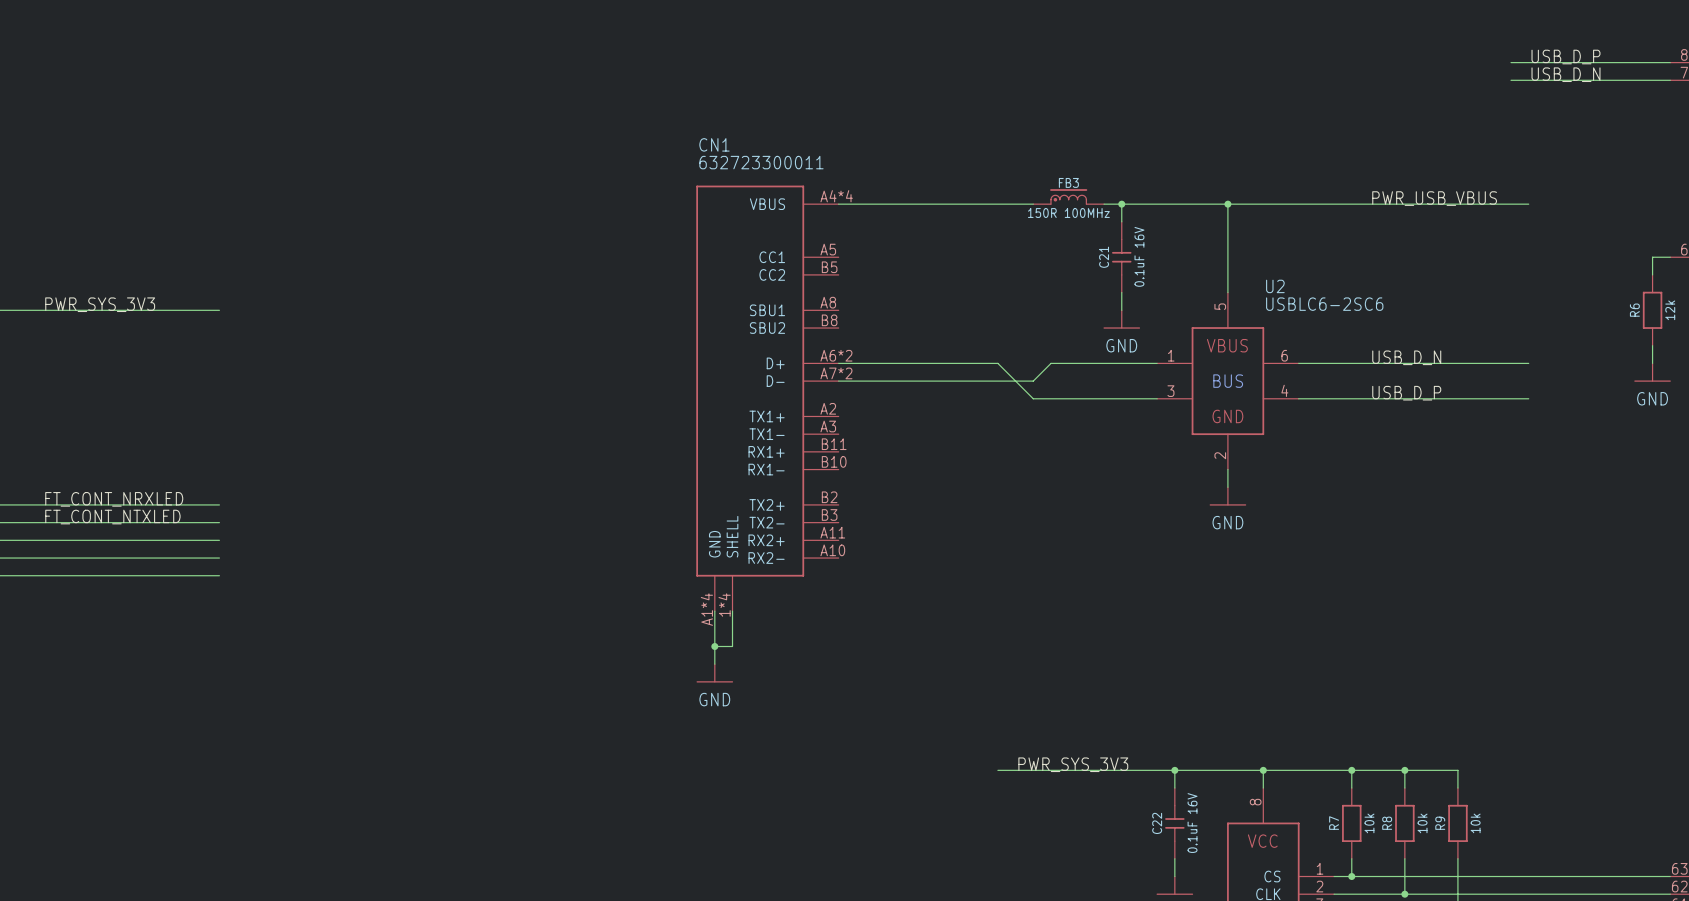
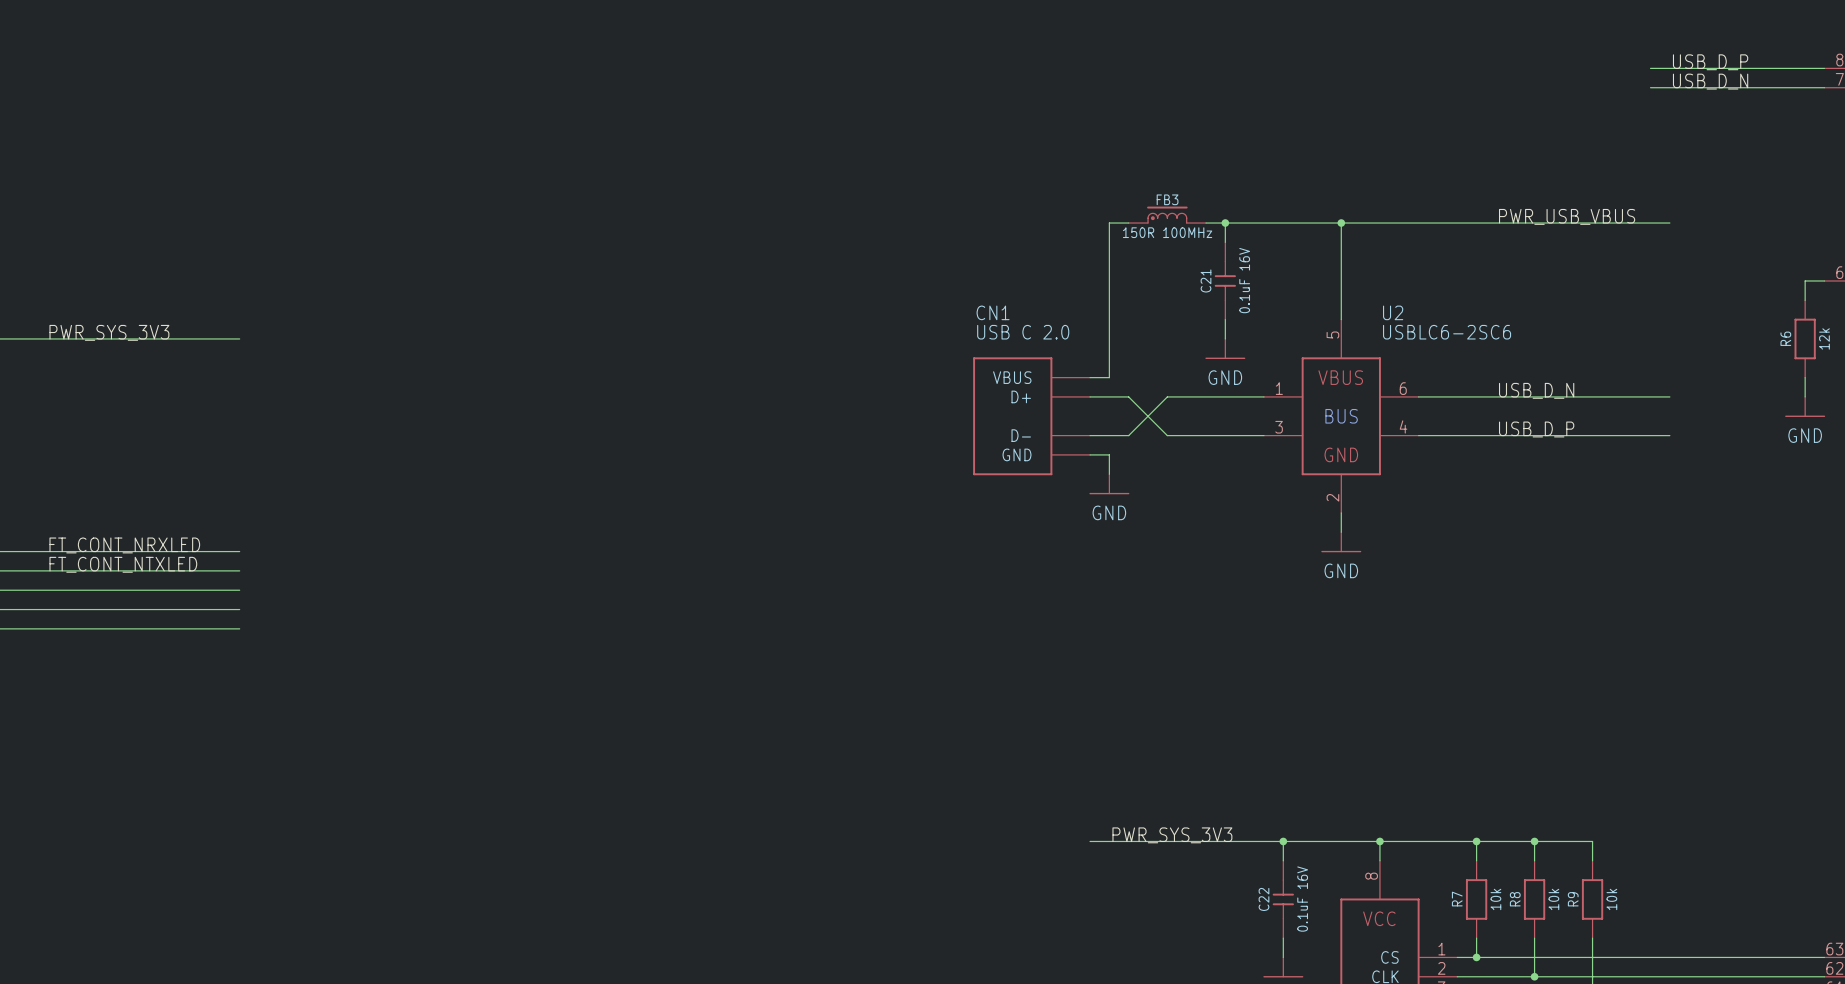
CN1 name position: CN1 (714, 144) -> CN1 (993, 312)
CN1 value: 632723300011 (761, 162) -> USB C 2.0 (1023, 332)
CN1 symbol: [696, 185, 839, 612] -> [973, 357, 1091, 476]
wire: (838, 204) (1015, 204) -> (1090, 377) (1109, 377) (1109, 223)
wire: (838, 363) (997, 363) (1033, 398) (1068, 398) -> (1090, 396) (1128, 396) (1167, 435)
wire: (1068, 363) (1050, 363) (1033, 381) (838, 381) -> (1167, 396) (1128, 435) (1090, 435)
wire: none -> (1090, 454) (1109, 454) (1109, 474)
power symbol: none -> GND (1109, 484)
wire: (714, 611) (714, 664) -> none
wire: (732, 611) (732, 646) (714, 646) -> none
junction: (714, 646) -> none
power symbol: GND (714, 673) -> none

